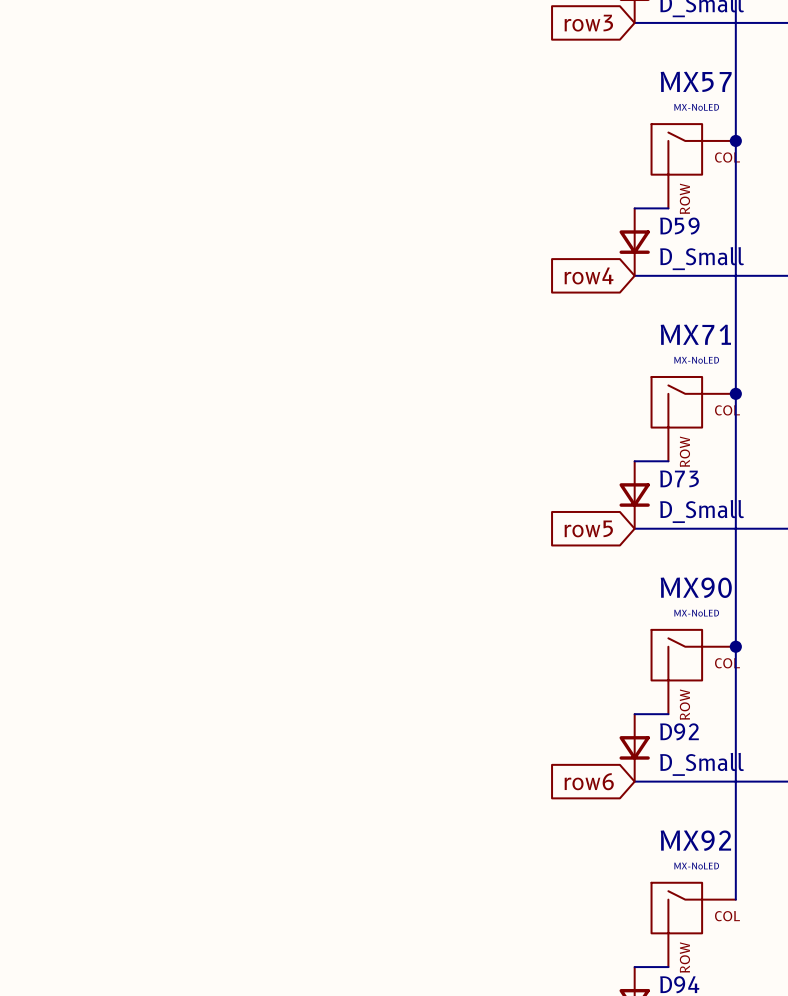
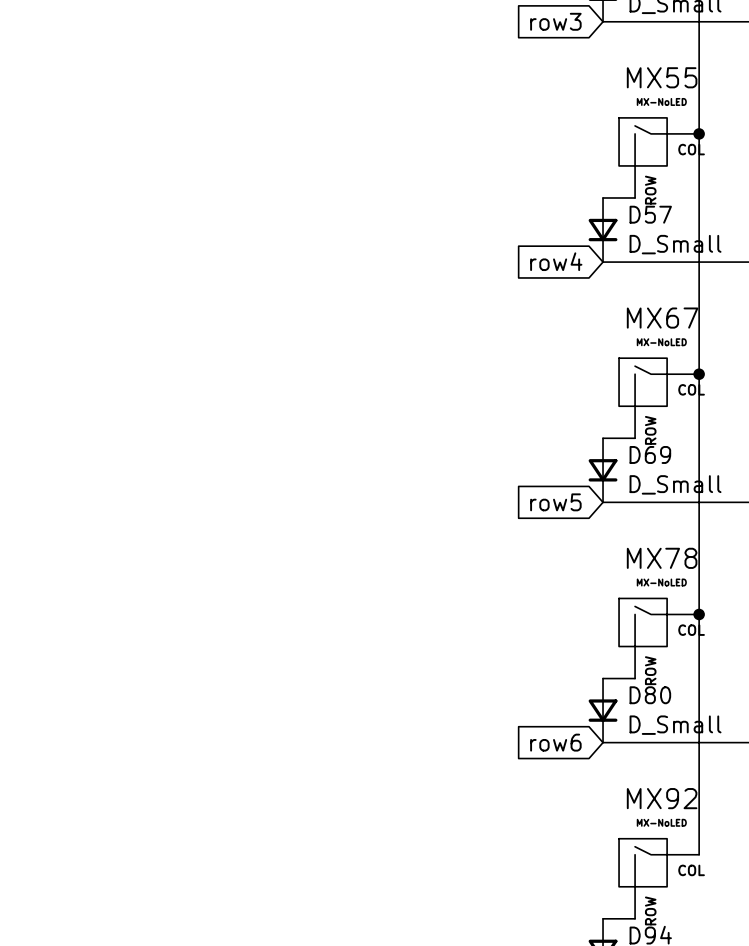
MX57 name: MX57 (696, 81) -> MX55 (662, 77)
D59 name: D59 (679, 226) -> D57 (650, 214)
MX71 name: MX71 (695, 334) -> MX67 (662, 318)
D73 name: D73 (679, 478) -> D69 (650, 454)
MX90 name: MX90 (696, 587) -> MX78 (662, 558)
D92 name: D92 (679, 731) -> D80 (650, 695)

